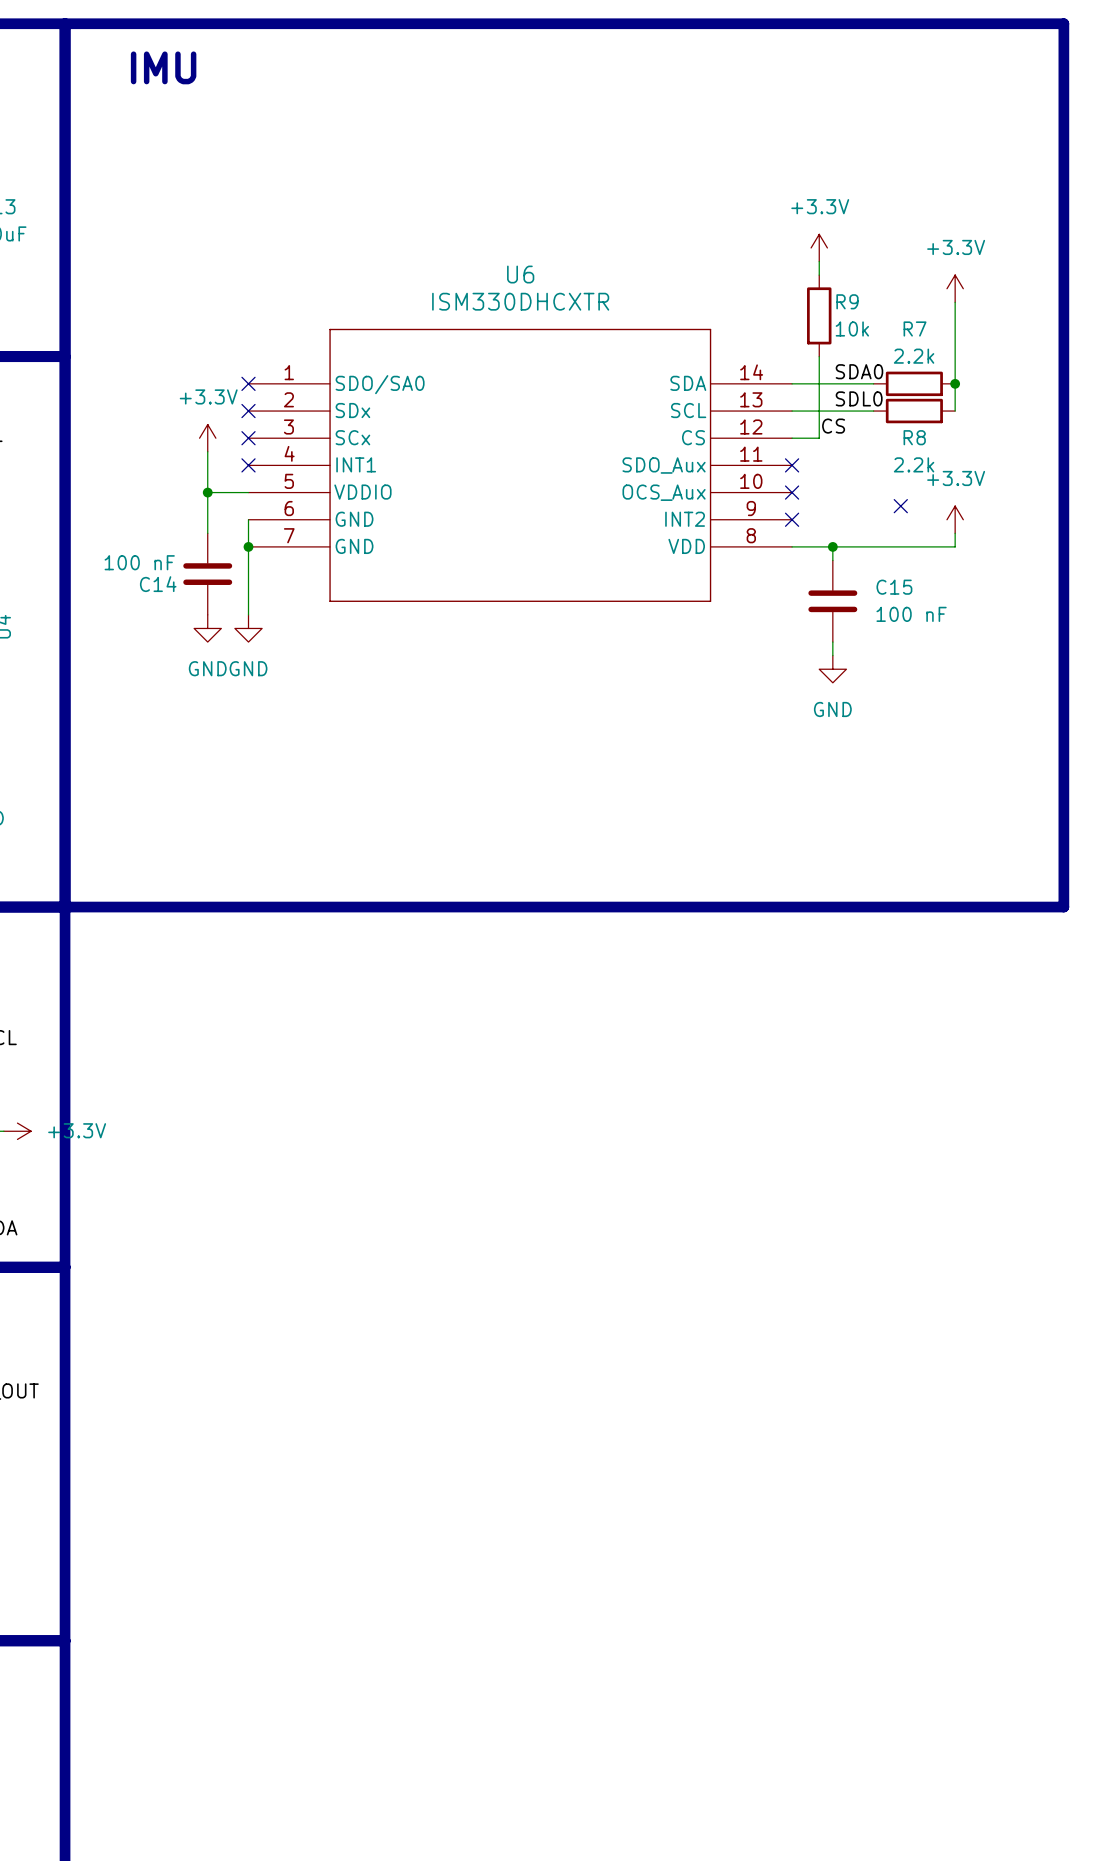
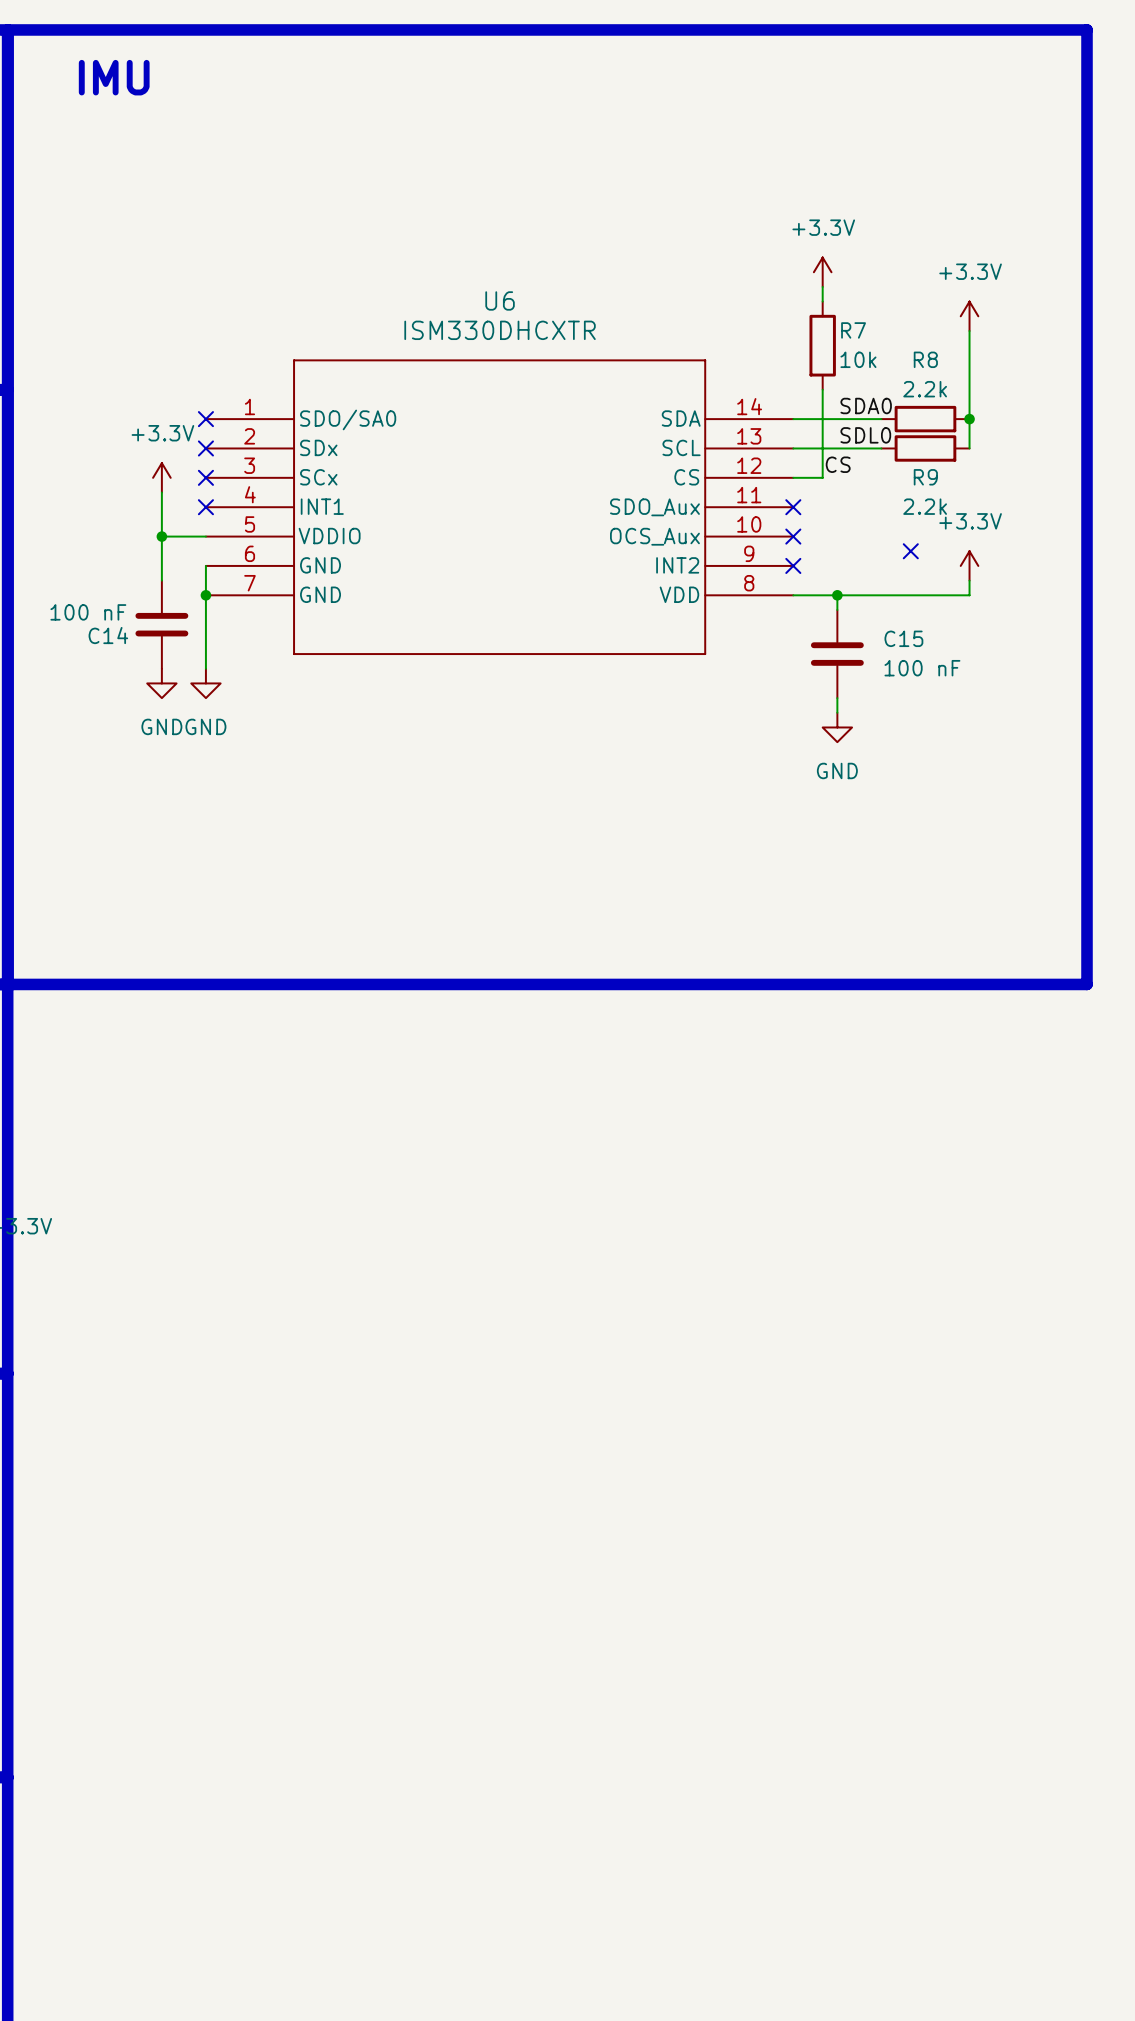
R9 name: R9 (847, 301) -> R7 (853, 330)
R7 name: R7 (915, 328) -> R8 (925, 359)
R8 name: R8 (914, 437) -> R9 (925, 477)

